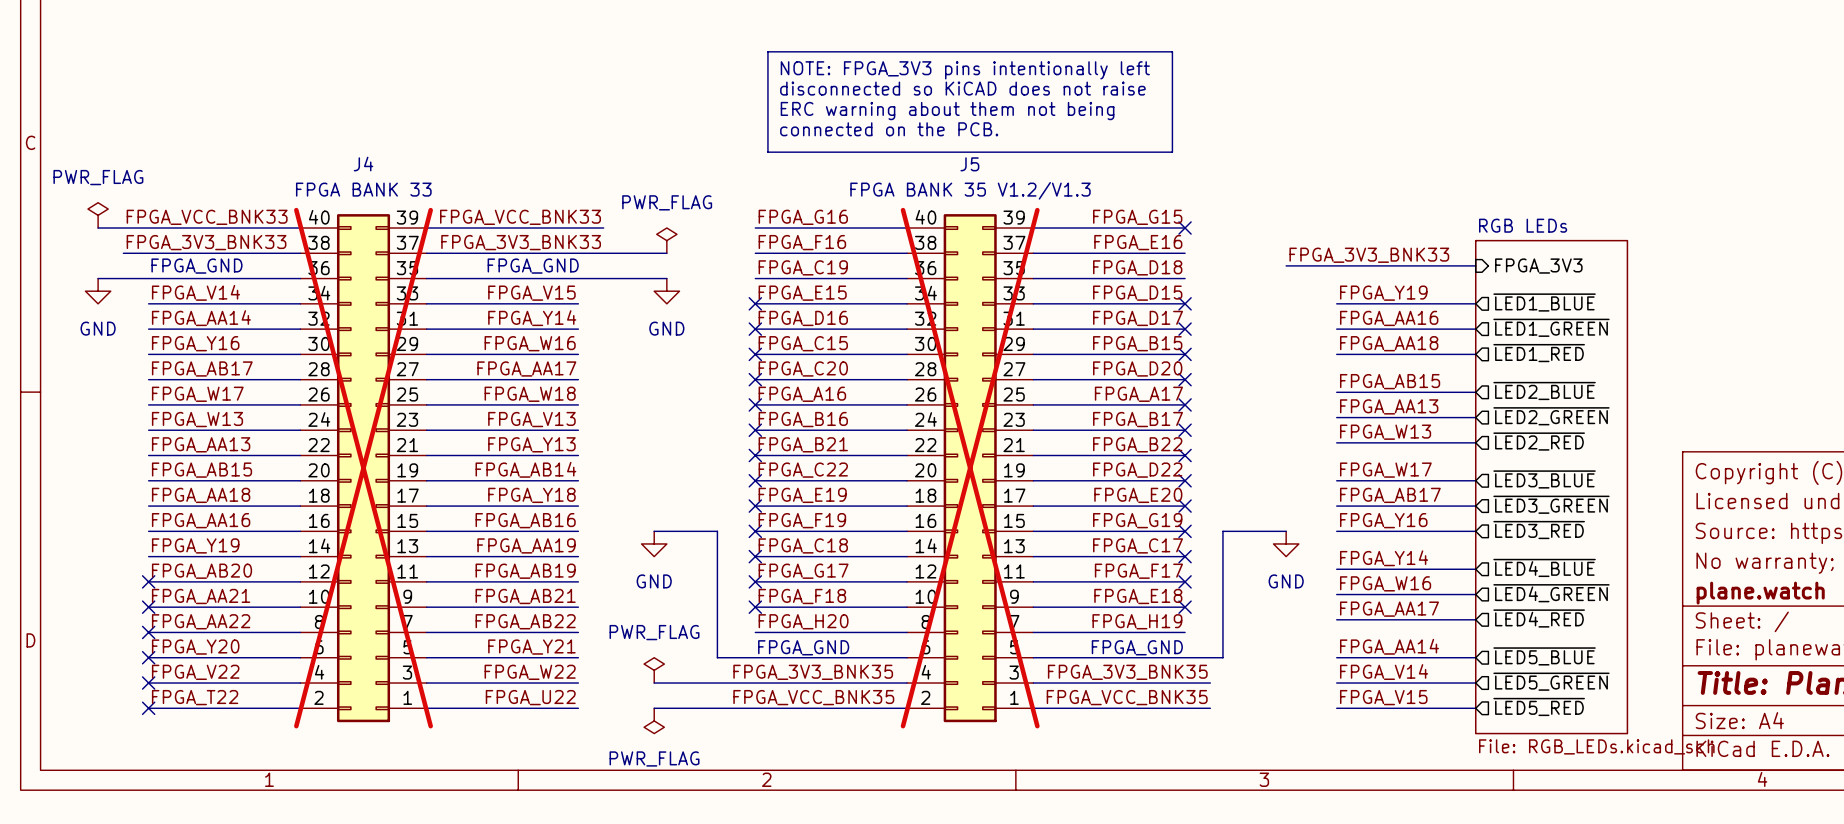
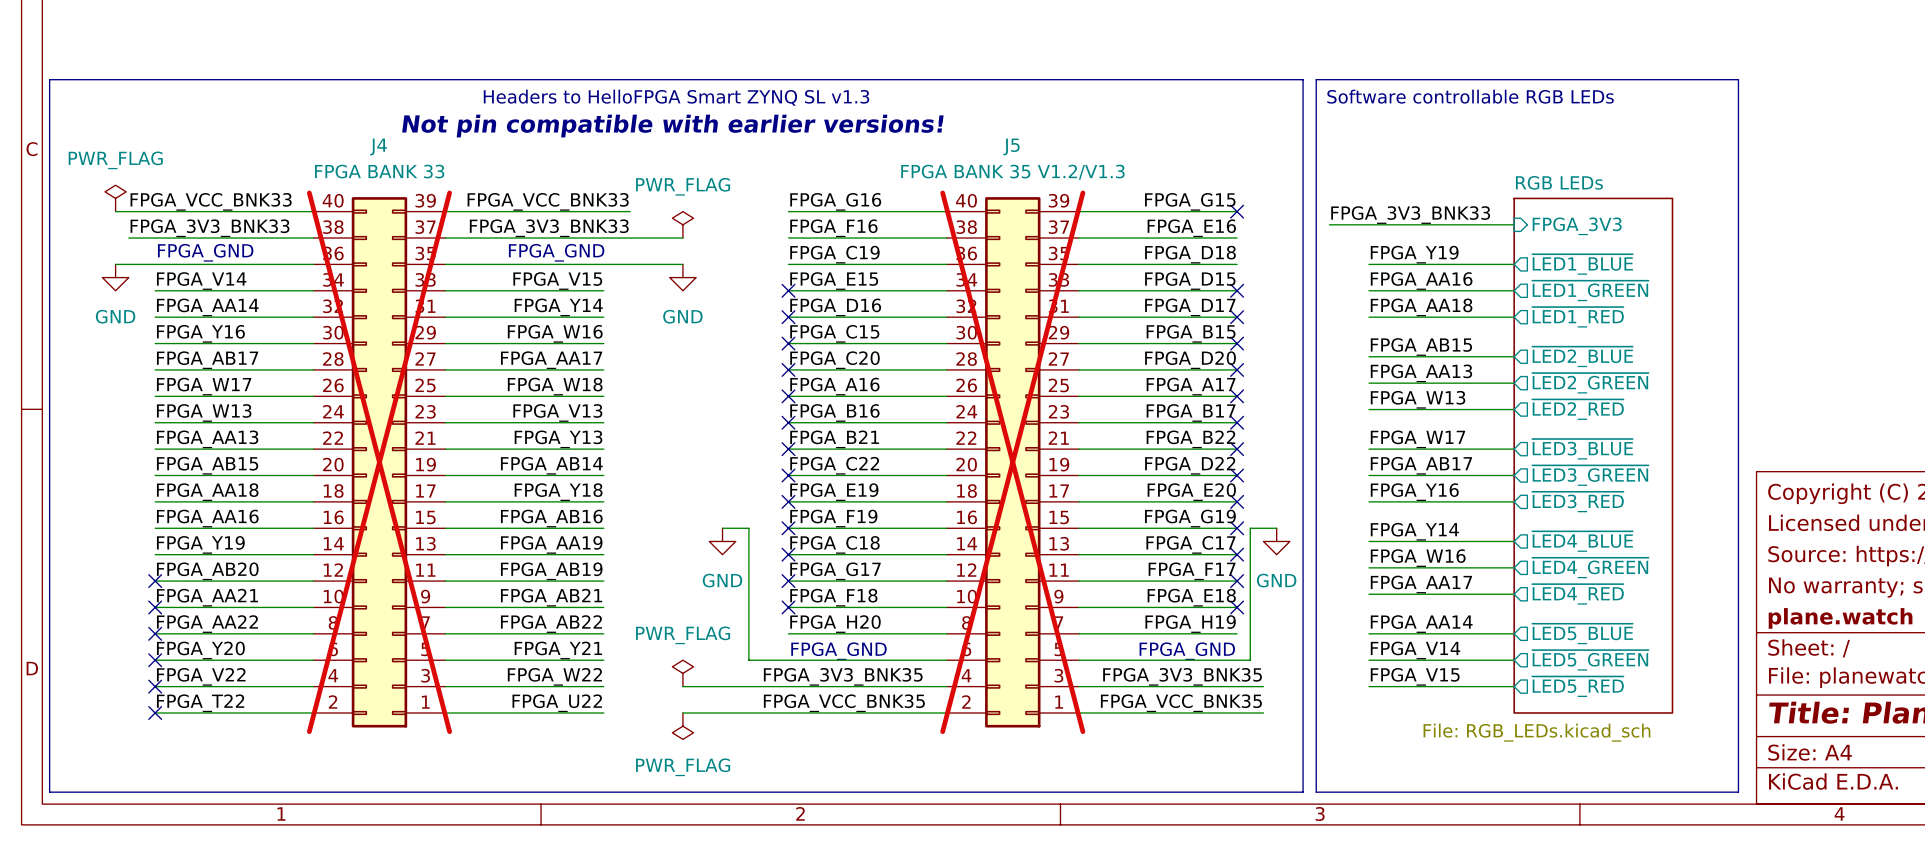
line: (767, 51) (1172, 51) (1172, 152) (767, 152) (767, 51) -> none
text: NOTE: FPGA_3V3 pins intentionally left (965, 70) -> none
line: none -> (49, 79) (1303, 79) (1303, 792) (49, 792) (49, 79)
line: none -> (1316, 79) (1738, 79) (1738, 792) (1316, 792) (1316, 79)
text: disconnected so KiCAD does not raise (962, 88) -> none
text: none -> Software controllable RGB LEDs (1470, 96)
text: none -> Headers to HelloFPGA Smart ZYNQ SL v1.3 (676, 97)
text: ERC warning about them not being (947, 111) -> none
text: none -> Not pin compatible with earlier versions! (672, 126)
text: connected on the PCB. (889, 129) -> none
label: none -> FPGA_VCC_BNK33 (211, 201)
label: none -> FPGA_VCC_BNK33 (548, 201)
label: none -> FPGA_G16 (835, 201)
label: none -> FPGA_G15 (1190, 201)
wire: none -> (115, 211) (313, 211)
wire: none -> (445, 211) (630, 211)
wire: none -> (788, 211) (946, 211)
wire: none -> (1078, 211) (1237, 211)
no-connect mark: none -> (1237, 211)
power symbol position: PWR_FLAG (98, 215) -> PWR_FLAG (115, 198)
wire: none -> (1329, 224) (1514, 224)
label: FPGA_VCC_BNK33 (207, 217) -> FPGA_3V3_BNK33 (209, 228)
label: FPGA_VCC_BNK33 (520, 217) -> FPGA_3V3_BNK33 (549, 228)
label: FPGA_G16 (803, 217) -> FPGA_F16 (833, 228)
label: FPGA_G15 (1137, 217) -> FPGA_E16 (1191, 228)
wire: (98, 228) (123, 228) -> none
wire: none -> (630, 238) (682, 238)
no-connect mark: (1185, 228) -> none
power symbol position: PWR_FLAG (666, 240) -> PWR_FLAG (682, 224)
label: FPGA_3V3_BNK33 (206, 242) -> none
label: FPGA_3V3_BNK33 (521, 242) -> none
label: FPGA_F16 (802, 242) -> FPGA_C19 (834, 254)
label: FPGA_E16 (1138, 242) -> FPGA_D18 (1190, 254)
wire: none -> (115, 264) (128, 264)
wire: (654, 253) (666, 253) -> none
label position: FPGA_3V3_BNK33 (1369, 255) -> FPGA_3V3_BNK33 (1410, 215)
wire: (1286, 265) (1475, 265) -> none
text position: FPGA_GND (196, 266) -> FPGA_GND (205, 252)
text position: FPGA_GND (533, 266) -> FPGA_GND (556, 252)
sheet pin position: FPGA_3V3 (1538, 266) -> FPGA_3V3 (1577, 226)
label: none -> FPGA_V14 (201, 281)
label: none -> FPGA_V15 (557, 281)
label: FPGA_C19 (803, 267) -> FPGA_E15 (834, 281)
label: FPGA_D18 (1137, 267) -> FPGA_D15 (1190, 281)
wire: (98, 278) (148, 278) -> none
wire: (578, 278) (666, 278) -> none
no-connect mark: none -> (788, 290)
no-connect mark: none -> (1237, 290)
power symbol position: GND (98, 291) -> GND (115, 277)
power symbol position: GND (666, 291) -> GND (682, 277)
label: FPGA_V14 (195, 292) -> FPGA_AA14 (207, 307)
label: FPGA_V15 (531, 293) -> FPGA_Y14 (558, 307)
label: FPGA_E15 (802, 293) -> FPGA_D16 (835, 307)
label: FPGA_D15 (1137, 293) -> FPGA_D17 (1190, 307)
label position: FPGA_Y19 (1383, 293) -> FPGA_Y19 (1414, 254)
sheet pin position: ~{LED1_BLUE} (1544, 302) -> ~{LED1_BLUE} (1582, 264)
wire: (1450, 303) (1475, 303) -> (1369, 317) (1395, 317)
label: FPGA_AA14 (201, 318) -> FPGA_Y16 (200, 333)
label: FPGA_Y14 (532, 318) -> FPGA_W16 (555, 333)
label: FPGA_D16 (803, 318) -> FPGA_C15 (834, 333)
label: FPGA_D17 (1138, 318) -> FPGA_B15 (1191, 333)
label position: FPGA_AA16 (1389, 318) -> FPGA_AA16 (1421, 281)
sheet pin position: ~{LED1_GREEN} (1551, 327) -> ~{LED1_GREEN} (1590, 290)
wire: (1336, 329) (1475, 329) -> (1369, 264) (1514, 264)
label: FPGA_Y16 (195, 343) -> FPGA_AB17 (207, 360)
label: FPGA_W16 (530, 343) -> FPGA_AA17 (551, 360)
label: FPGA_C15 (803, 343) -> FPGA_C20 (834, 360)
label: FPGA_B15 (1137, 343) -> FPGA_D20 (1190, 360)
label position: FPGA_AA18 (1389, 343) -> FPGA_AA18 (1421, 307)
sheet pin position: ~{LED1_RED} (1539, 353) -> ~{LED1_RED} (1578, 317)
wire: (1336, 354) (1475, 354) -> (1369, 290) (1514, 290)
label: FPGA_AB17 (202, 368) -> FPGA_W17 (204, 386)
label: FPGA_AA17 (526, 368) -> FPGA_W18 (555, 386)
label: FPGA_C20 (803, 368) -> FPGA_A16 (834, 386)
label: FPGA_D20 (1137, 368) -> FPGA_A17 (1191, 386)
label position: FPGA_AB15 (1390, 381) -> FPGA_AB15 (1421, 347)
sheet pin position: ~{LED2_BLUE} (1544, 390) -> ~{LED2_BLUE} (1582, 356)
wire: (1450, 392) (1475, 392) -> (1369, 409) (1395, 409)
label: FPGA_W17 (197, 394) -> FPGA_W13 (204, 412)
label: FPGA_W18 (530, 394) -> FPGA_V13 (557, 412)
label: FPGA_A16 (802, 394) -> FPGA_B16 (834, 412)
label: FPGA_A17 (1138, 394) -> FPGA_B17 (1191, 412)
label position: FPGA_AA13 (1389, 406) -> FPGA_AA13 (1421, 373)
sheet pin position: ~{LED2_GREEN} (1551, 416) -> ~{LED2_GREEN} (1590, 383)
wire: (1336, 417) (1475, 417) -> (1369, 356) (1514, 356)
label: FPGA_W13 (197, 419) -> FPGA_AA13 (207, 439)
label: FPGA_V13 (531, 419) -> FPGA_Y13 (558, 439)
label: FPGA_B16 (803, 419) -> FPGA_B21 (834, 439)
label: FPGA_B17 (1138, 419) -> FPGA_B22 (1190, 439)
label position: FPGA_W13 (1385, 432) -> FPGA_W13 (1418, 399)
sheet pin position: ~{LED2_RED} (1539, 441) -> ~{LED2_RED} (1578, 409)
wire: (1336, 442) (1475, 442) -> (1369, 383) (1514, 383)
label: FPGA_AA13 (201, 444) -> FPGA_AB15 (207, 465)
label: FPGA_Y13 (531, 444) -> FPGA_AB14 (551, 465)
label: FPGA_B21 (803, 444) -> FPGA_C22 (834, 465)
label: FPGA_B22 (1137, 444) -> FPGA_D22 (1190, 465)
J4 position: (363, 468) -> (379, 462)
J5 position: (970, 468) -> (1012, 462)
label: FPGA_AB14 (525, 469) -> FPGA_Y18 (558, 492)
label: FPGA_AB15 (202, 470) -> FPGA_AA18 (207, 492)
label: FPGA_C22 (803, 470) -> FPGA_E19 (834, 492)
label: FPGA_D22 (1137, 470) -> FPGA_E20 (1191, 492)
label position: FPGA_W17 (1385, 470) -> FPGA_W17 (1417, 439)
sheet pin position: ~{LED3_BLUE} (1544, 479) -> ~{LED3_BLUE} (1582, 449)
wire: (1450, 480) (1475, 480) -> (1369, 501) (1395, 501)
sheet RGB LEDs position: (1551, 487) -> (1593, 455)
label: FPGA_AA18 (201, 495) -> FPGA_AA16 (207, 518)
label: FPGA_Y18 (531, 495) -> FPGA_AB16 (551, 518)
label: FPGA_E19 (802, 495) -> FPGA_F19 (833, 518)
label: FPGA_E20 (1138, 495) -> FPGA_G19 (1190, 518)
label position: FPGA_AB17 (1390, 495) -> FPGA_AB17 (1421, 465)
sheet pin position: ~{LED3_GREEN} (1551, 504) -> ~{LED3_GREEN} (1590, 475)
wire: none -> (1276, 528) (1250, 528) (1250, 660) (1237, 660)
wire: (1336, 506) (1475, 506) -> (1369, 449) (1514, 449)
label: FPGA_AA16 (201, 520) -> FPGA_Y19 (200, 544)
label: FPGA_AB16 (525, 520) -> FPGA_AA19 (551, 544)
label: FPGA_F19 (802, 520) -> FPGA_C18 (834, 544)
label: FPGA_G19 (1137, 520) -> FPGA_C17 (1190, 544)
label position: FPGA_Y16 (1383, 520) -> FPGA_Y16 (1414, 492)
sheet pin position: ~{LED3_RED} (1539, 530) -> ~{LED3_RED} (1578, 502)
wire: (654, 531) (717, 531) -> (722, 528) (748, 528) (748, 554)
wire: (1286, 531) (1222, 531) (1222, 657) (1210, 657) -> none
wire: (1336, 531) (1475, 531) -> (1369, 475) (1514, 475)
power symbol position: GND (654, 543) -> GND (722, 541)
power symbol position: GND (1286, 543) -> GND (1276, 541)
label: FPGA_Y19 (195, 545) -> FPGA_AB20 (207, 571)
label: FPGA_AA19 (526, 545) -> FPGA_AB19 (551, 571)
label: FPGA_C18 (803, 545) -> FPGA_G17 (835, 571)
label: FPGA_C17 (1138, 545) -> FPGA_F17 (1192, 571)
no-connect mark: none -> (155, 581)
label position: FPGA_Y14 (1384, 558) -> FPGA_Y14 (1414, 531)
sheet pin position: ~{LED4_BLUE} (1544, 567) -> ~{LED4_BLUE} (1582, 541)
wire: (1450, 569) (1475, 569) -> (1369, 594) (1395, 594)
label: FPGA_AB20 (202, 571) -> FPGA_AA21 (207, 597)
label: FPGA_AB19 (525, 571) -> FPGA_AB21 (551, 597)
label: FPGA_G17 (803, 571) -> FPGA_F18 (833, 597)
label: FPGA_F17 (1138, 571) -> FPGA_E18 (1191, 597)
label position: FPGA_W16 (1385, 583) -> FPGA_W16 (1418, 558)
sheet pin position: ~{LED4_GREEN} (1551, 593) -> ~{LED4_GREEN} (1590, 567)
wire: (1336, 594) (1475, 594) -> (1369, 541) (1514, 541)
label: FPGA_AA21 (201, 596) -> FPGA_AA22 (207, 624)
label: FPGA_AB21 (525, 596) -> FPGA_AB22 (551, 624)
label: FPGA_F18 (802, 596) -> FPGA_H20 (835, 624)
label: FPGA_E18 (1138, 596) -> FPGA_H19 (1190, 624)
no-connect mark: (755, 607) -> none
no-connect mark: (1185, 607) -> none
label position: FPGA_AA17 (1389, 609) -> FPGA_AA17 (1421, 584)
sheet pin position: ~{LED4_RED} (1539, 618) -> ~{LED4_RED} (1578, 594)
wire: (1336, 619) (1475, 619) -> (1369, 567) (1514, 567)
label: FPGA_AA22 (201, 621) -> FPGA_Y20 (200, 650)
label: FPGA_AB22 (525, 621) -> FPGA_Y21 (558, 650)
label: FPGA_H20 (803, 621) -> none
label: FPGA_H19 (1137, 621) -> none
wire: (717, 632) (717, 657) -> (748, 660) (788, 660)
power symbol: none -> PWR_FLAG (682, 673)
label position: FPGA_AA14 (1389, 646) -> FPGA_AA14 (1421, 624)
label: FPGA_Y20 (195, 647) -> FPGA_V22 (201, 676)
label: FPGA_Y21 (531, 647) -> FPGA_W22 (554, 676)
text position: FPGA_GND (803, 647) -> FPGA_GND (838, 651)
label: none -> FPGA_3V3_BNK35 (843, 676)
label: none -> FPGA_3V3_BNK35 (1182, 676)
text position: FPGA_GND (1137, 647) -> FPGA_GND (1187, 651)
sheet pin position: ~{LED5_BLUE} (1544, 656) -> ~{LED5_BLUE} (1582, 633)
wire: none -> (682, 686) (748, 686)
wire: (1450, 657) (1475, 657) -> (1369, 686) (1395, 686)
power symbol: PWR_FLAG (654, 670) -> none
label: FPGA_V22 (195, 672) -> FPGA_T22 (200, 703)
label: FPGA_W22 (530, 672) -> FPGA_U22 (557, 703)
label: FPGA_3V3_BNK35 (813, 672) -> FPGA_VCC_BNK35 (844, 703)
label: FPGA_3V3_BNK35 (1127, 672) -> FPGA_VCC_BNK35 (1181, 703)
label position: FPGA_V14 (1384, 672) -> FPGA_V14 (1415, 650)
sheet pin position: ~{LED5_GREEN} (1551, 681) -> ~{LED5_GREEN} (1590, 660)
wire: (1336, 683) (1475, 683) -> (1369, 633) (1514, 633)
power symbol: none -> PWR_FLAG (682, 726)
label: FPGA_T22 (195, 697) -> none
label: FPGA_U22 (530, 697) -> none
label: FPGA_VCC_BNK35 (813, 697) -> none
label: FPGA_VCC_BNK35 (1127, 697) -> none
label position: FPGA_V15 (1383, 697) -> FPGA_V15 (1415, 676)
sheet pin position: ~{LED5_RED} (1539, 706) -> ~{LED5_RED} (1578, 686)
wire: (148, 708) (300, 708) -> none
no-connect mark: (148, 708) -> none
wire: (426, 708) (578, 708) -> none
wire: (654, 708) (906, 708) -> none
wire: (1033, 708) (1210, 708) -> none
wire: (1336, 708) (1475, 708) -> (1369, 660) (1514, 660)
power symbol: PWR_FLAG (654, 720) -> none
sheet RGB LEDs value position: File: RGB_LEDs.kicad_sch (1596, 746) -> File: RGB_LEDs.kicad_sch (1536, 732)

